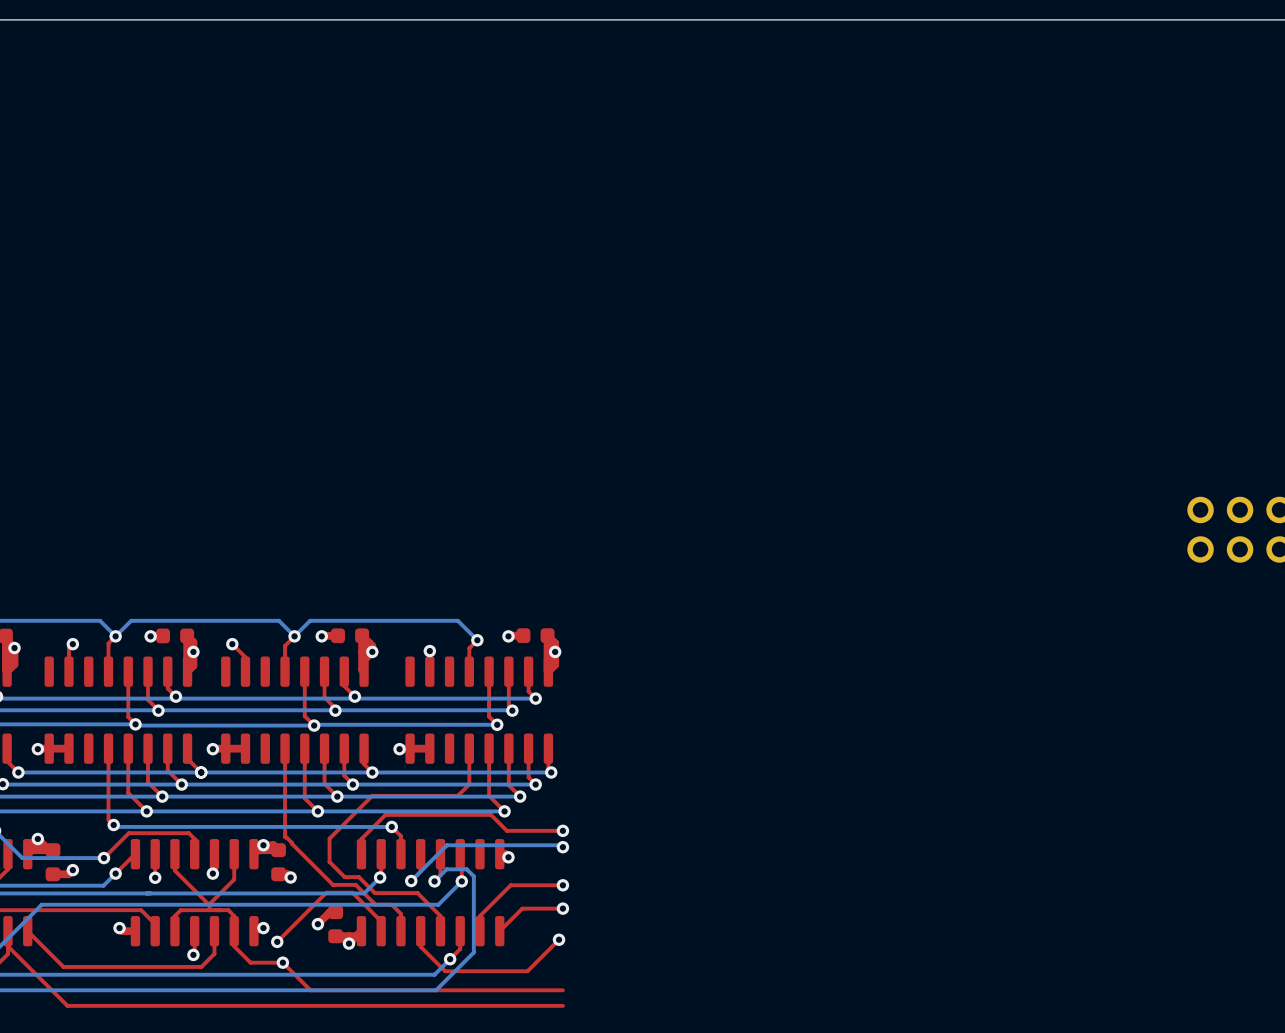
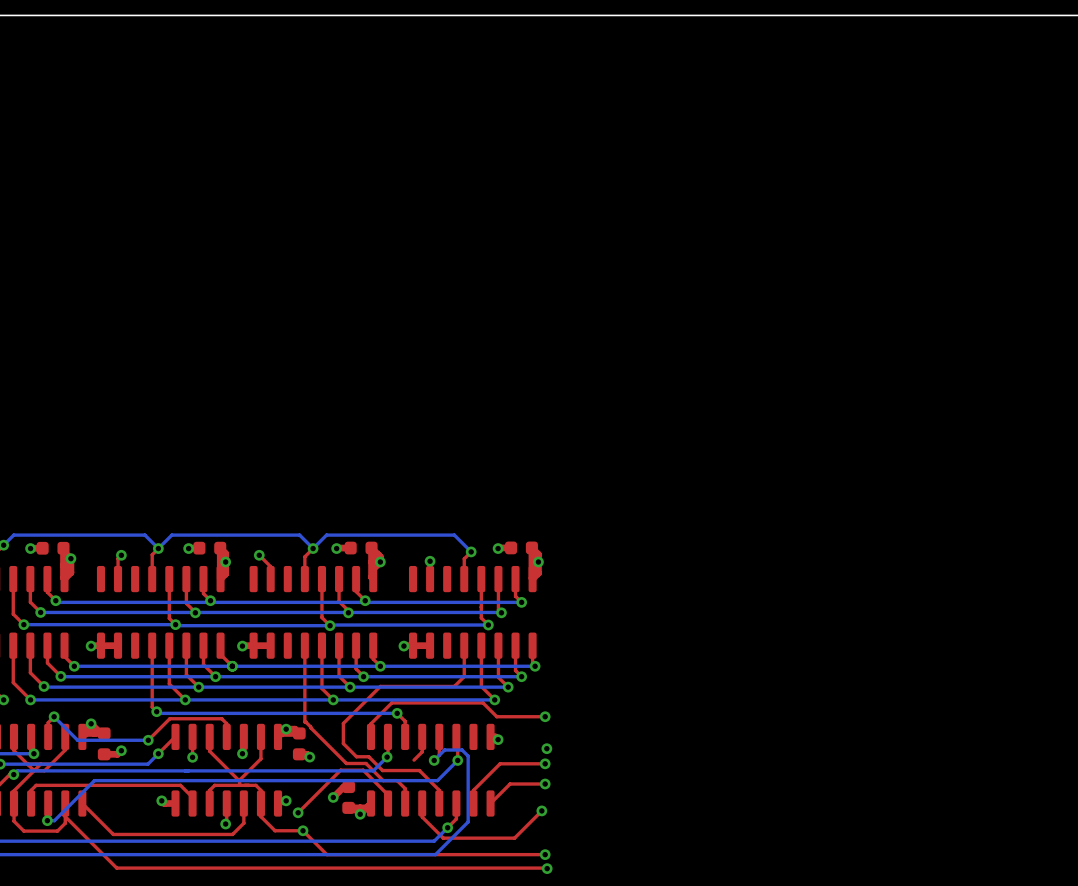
bottom track: (562, 847) (561, 845) (446, 845) (411, 881) -> none
via position: (562, 847) -> (546, 748)
via: (411, 881) -> none
via: none -> (545, 854)
via: none -> (547, 868)

